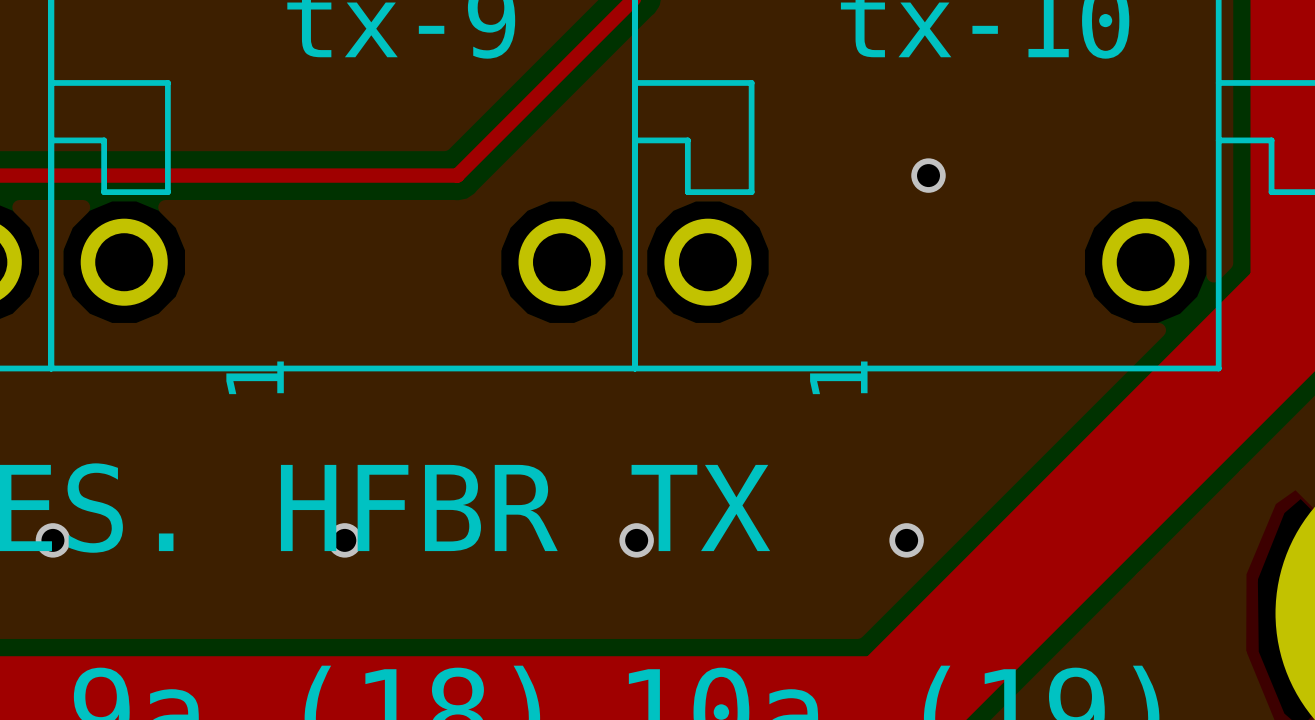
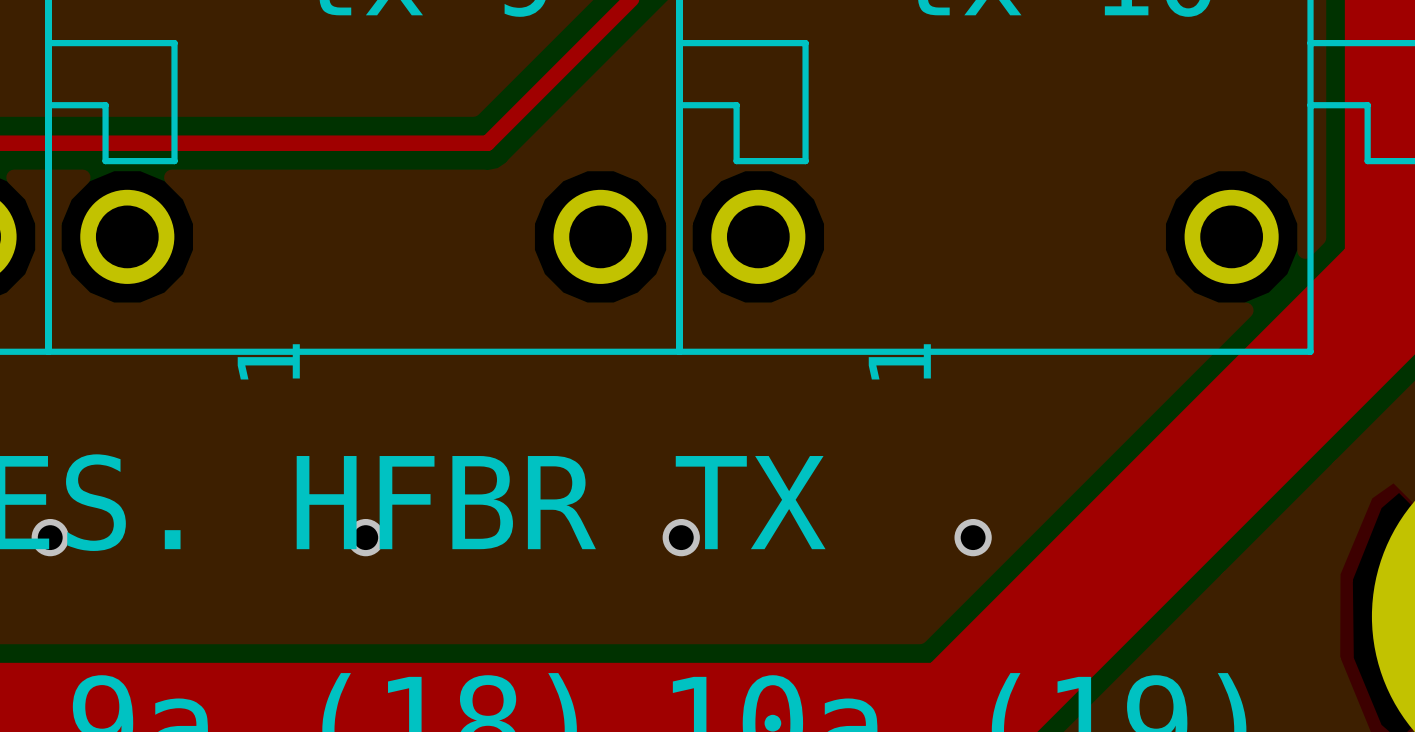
via: (928, 175) -> none

